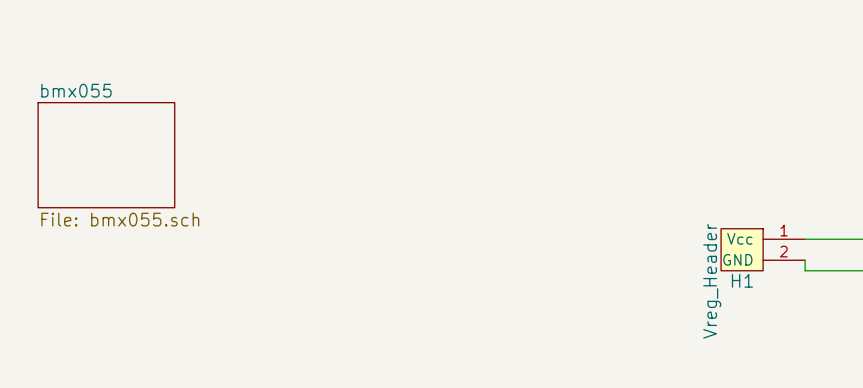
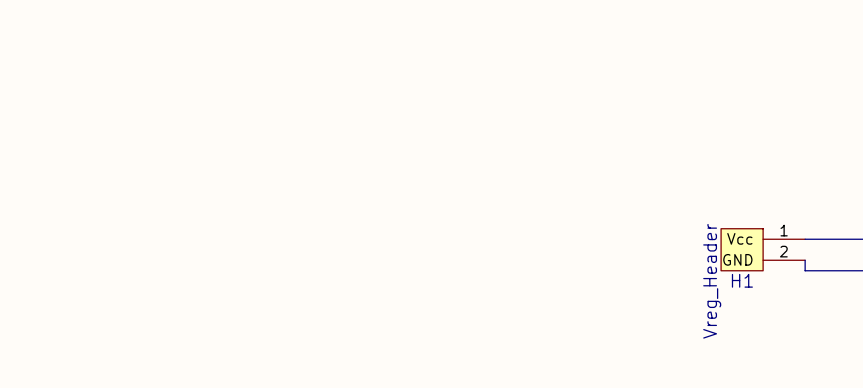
sheet bmx055: File: bmx055.sch (106, 155) -> none

